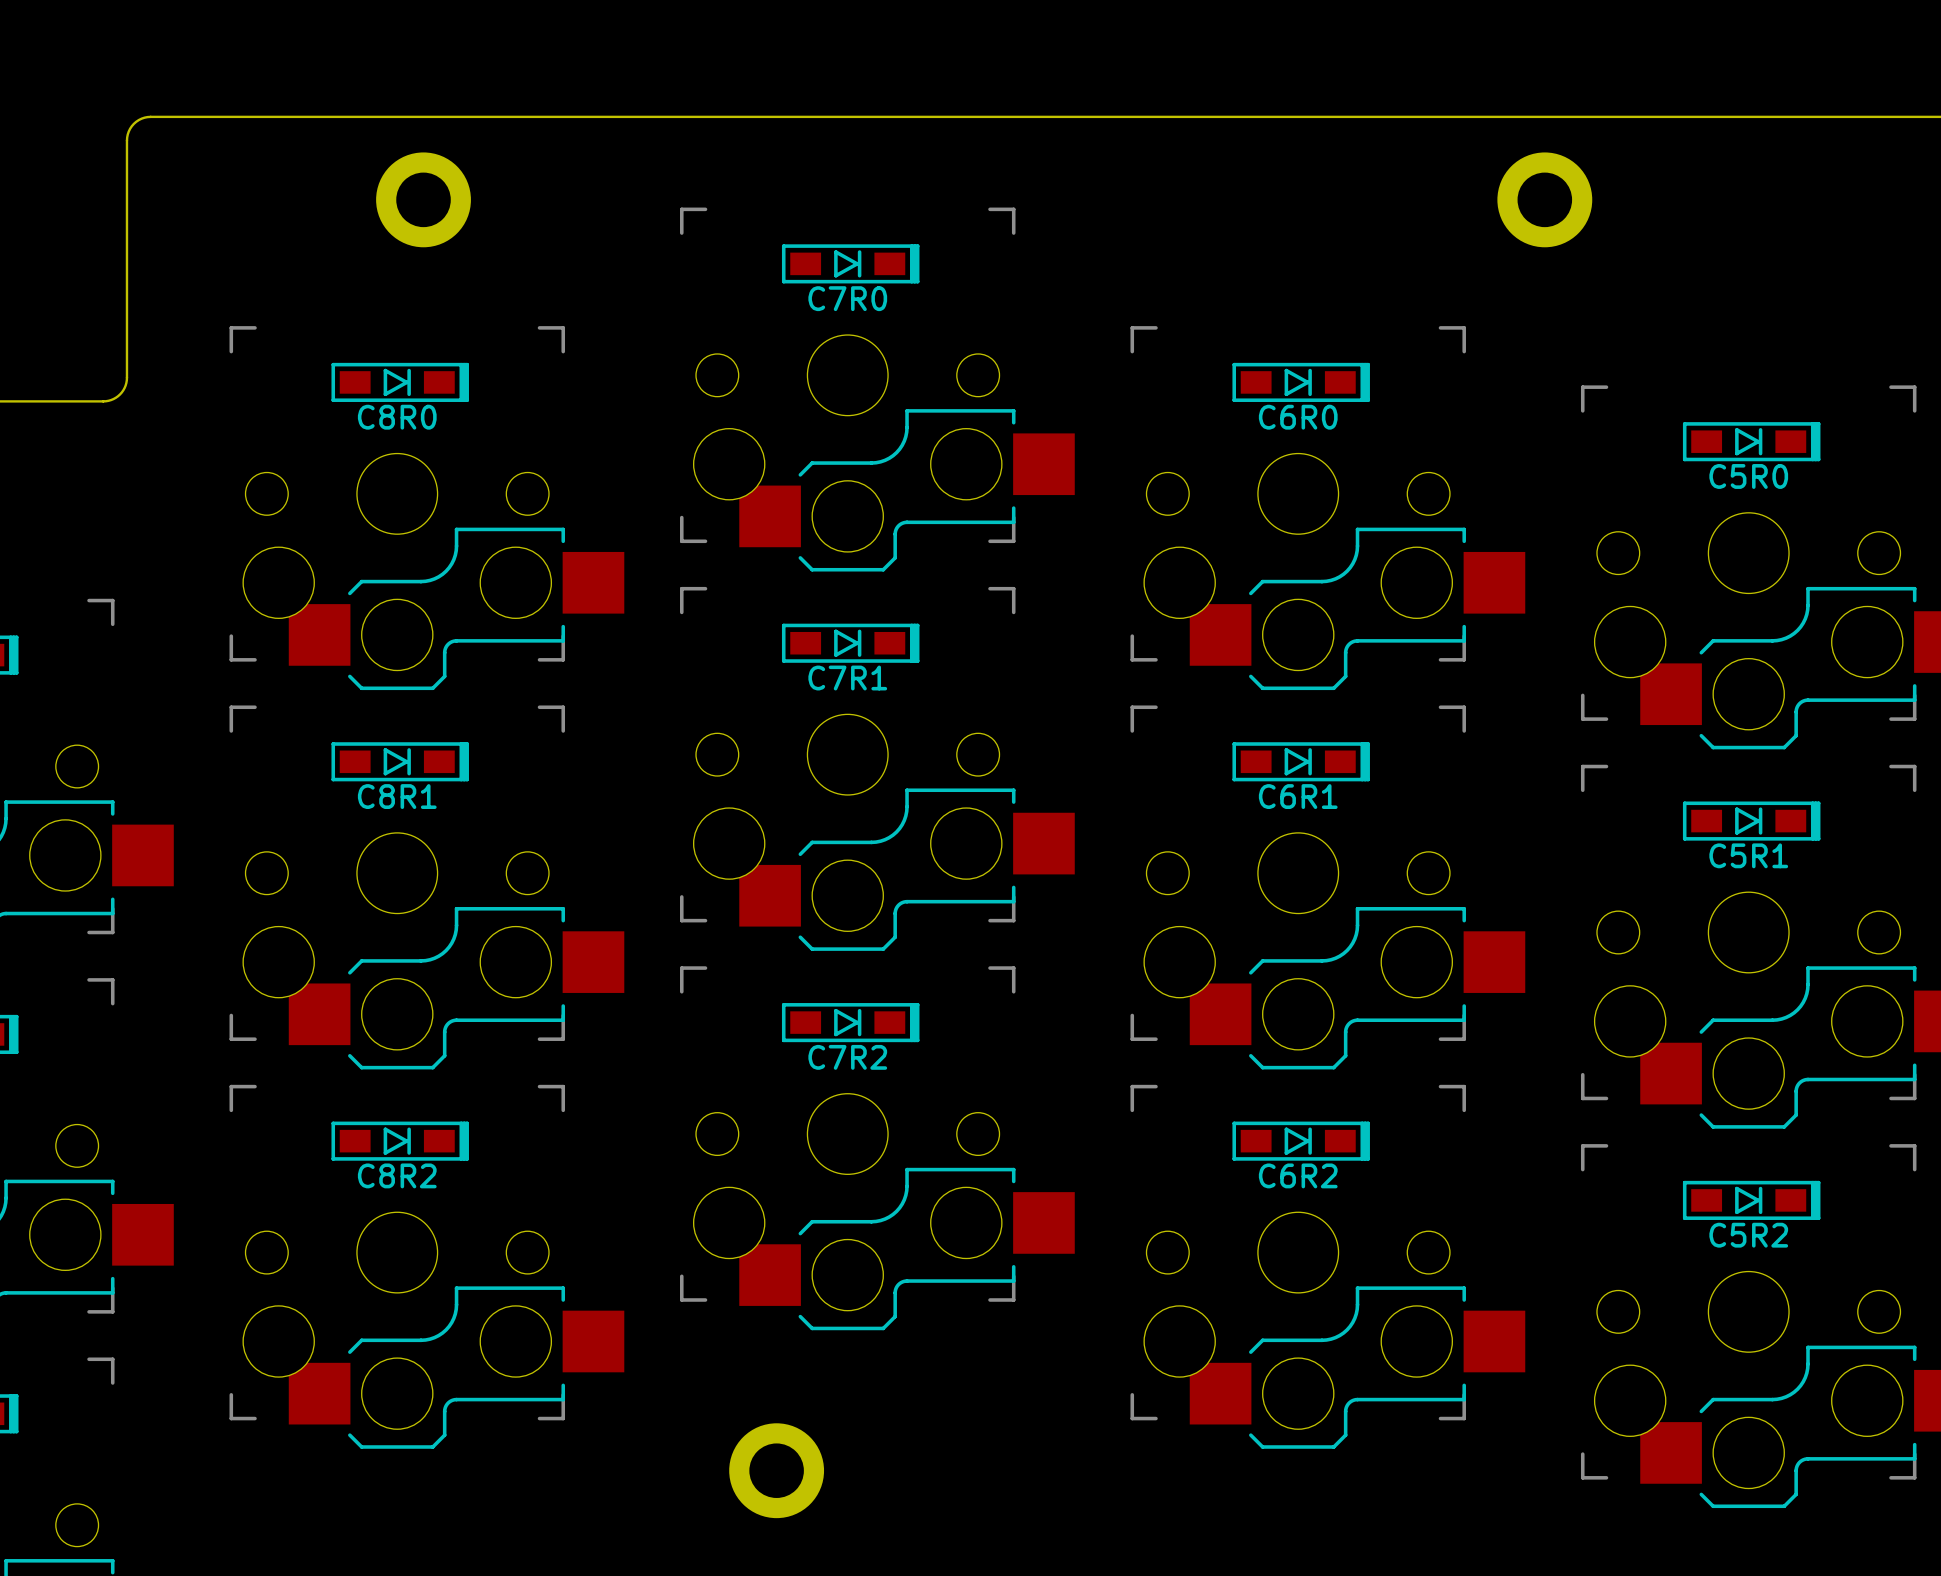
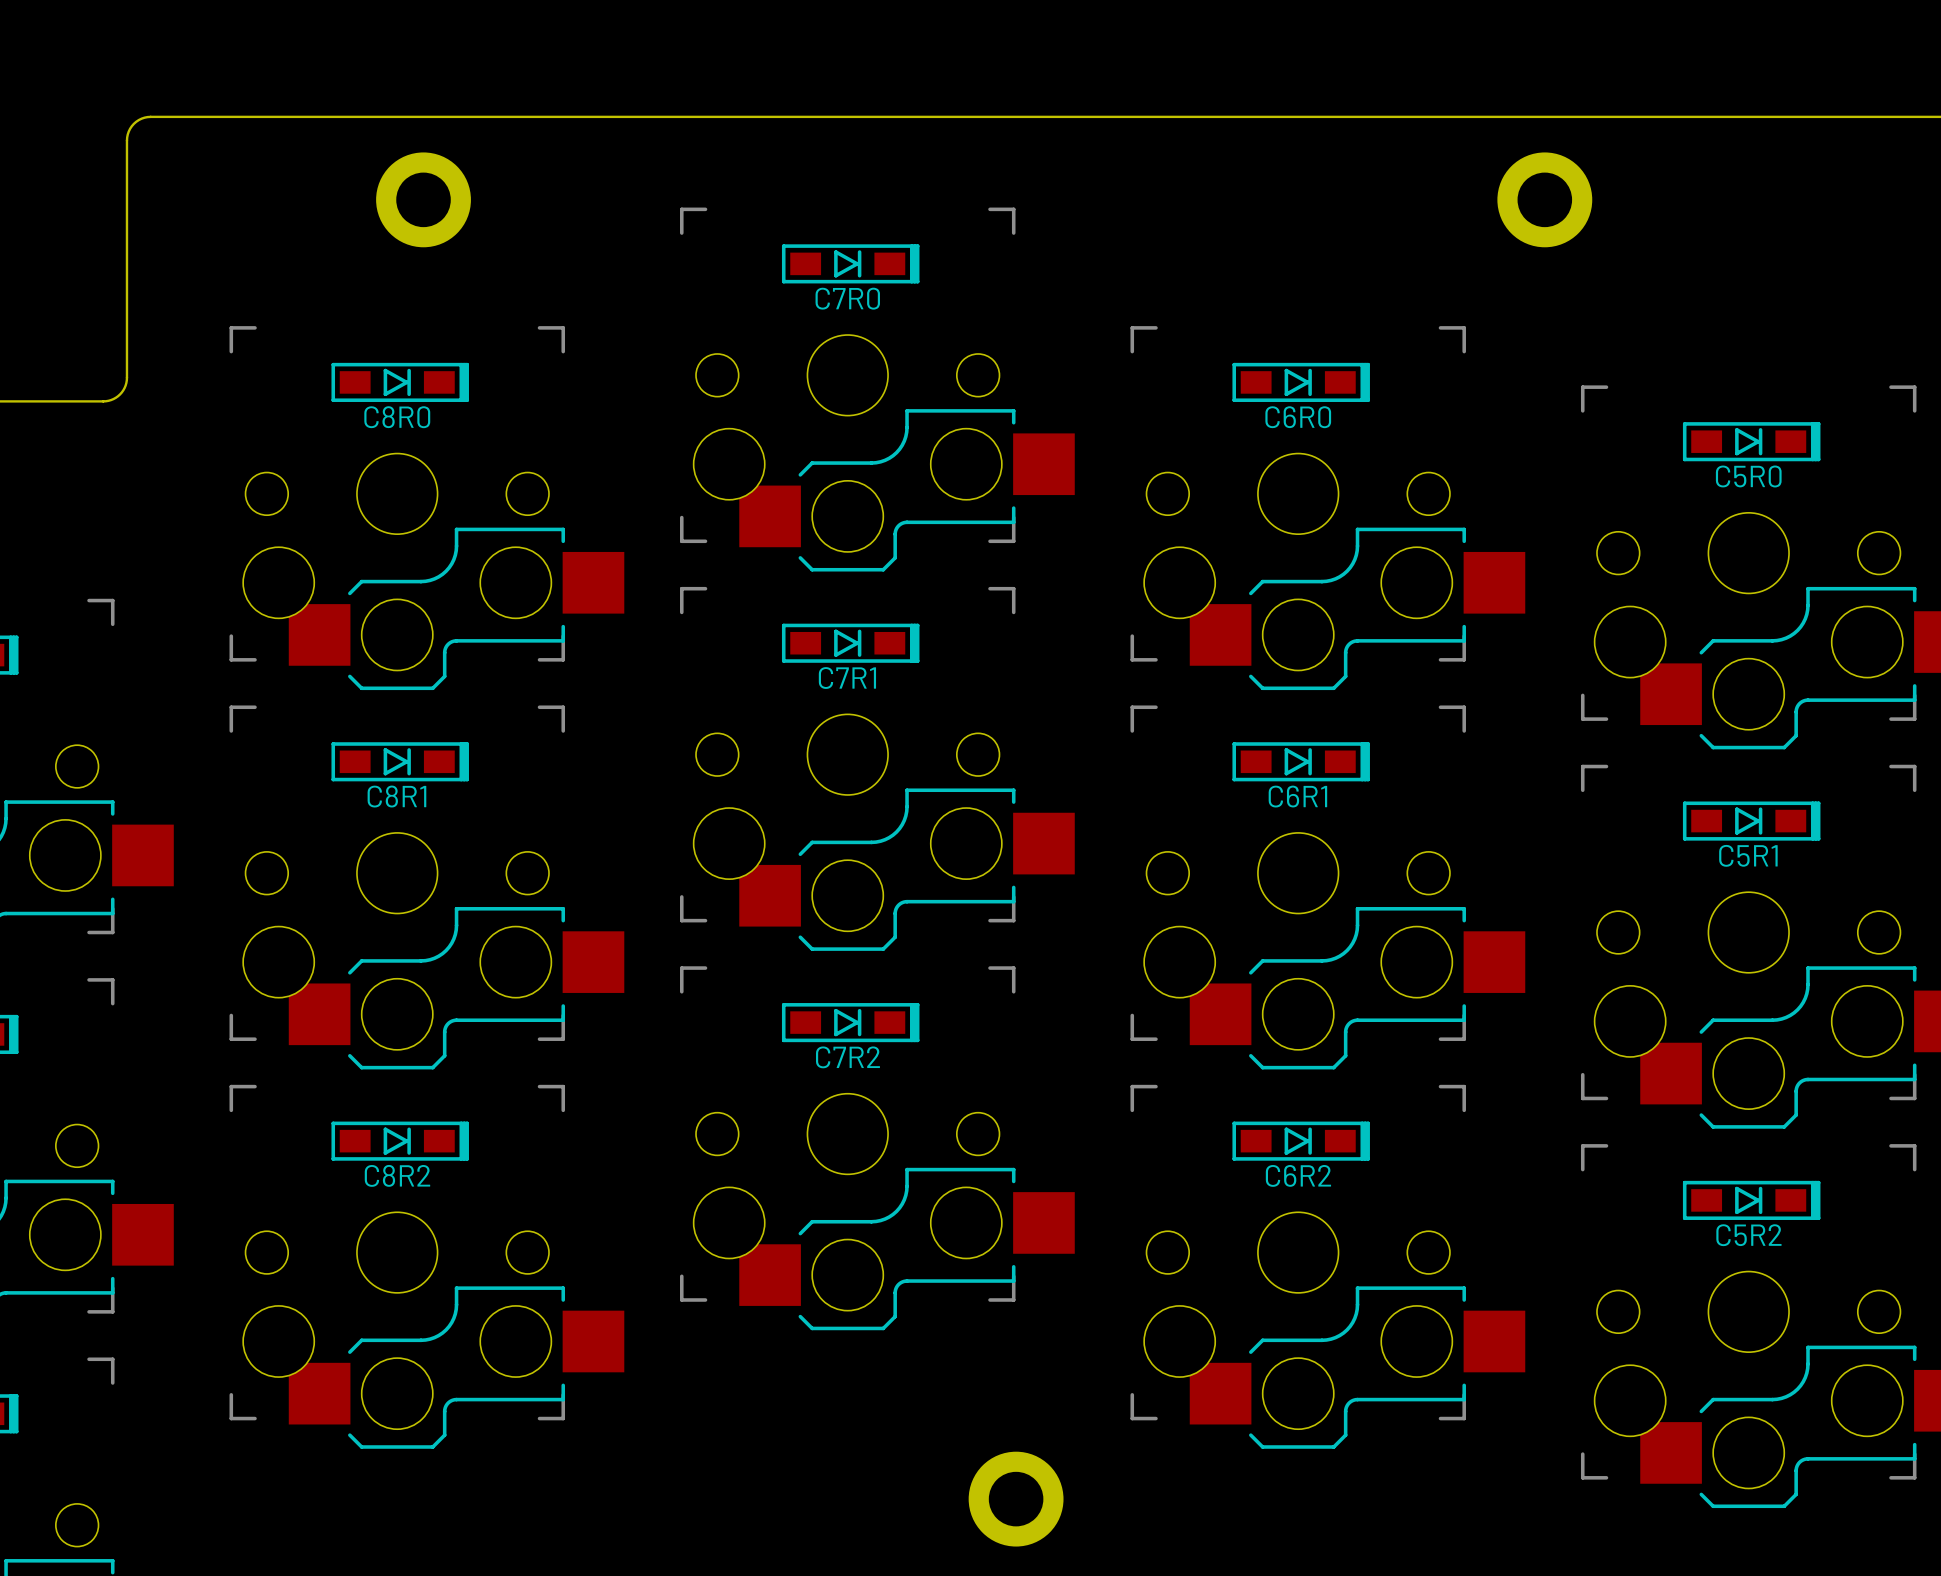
part position: (776, 1470) -> (1016, 1499)

